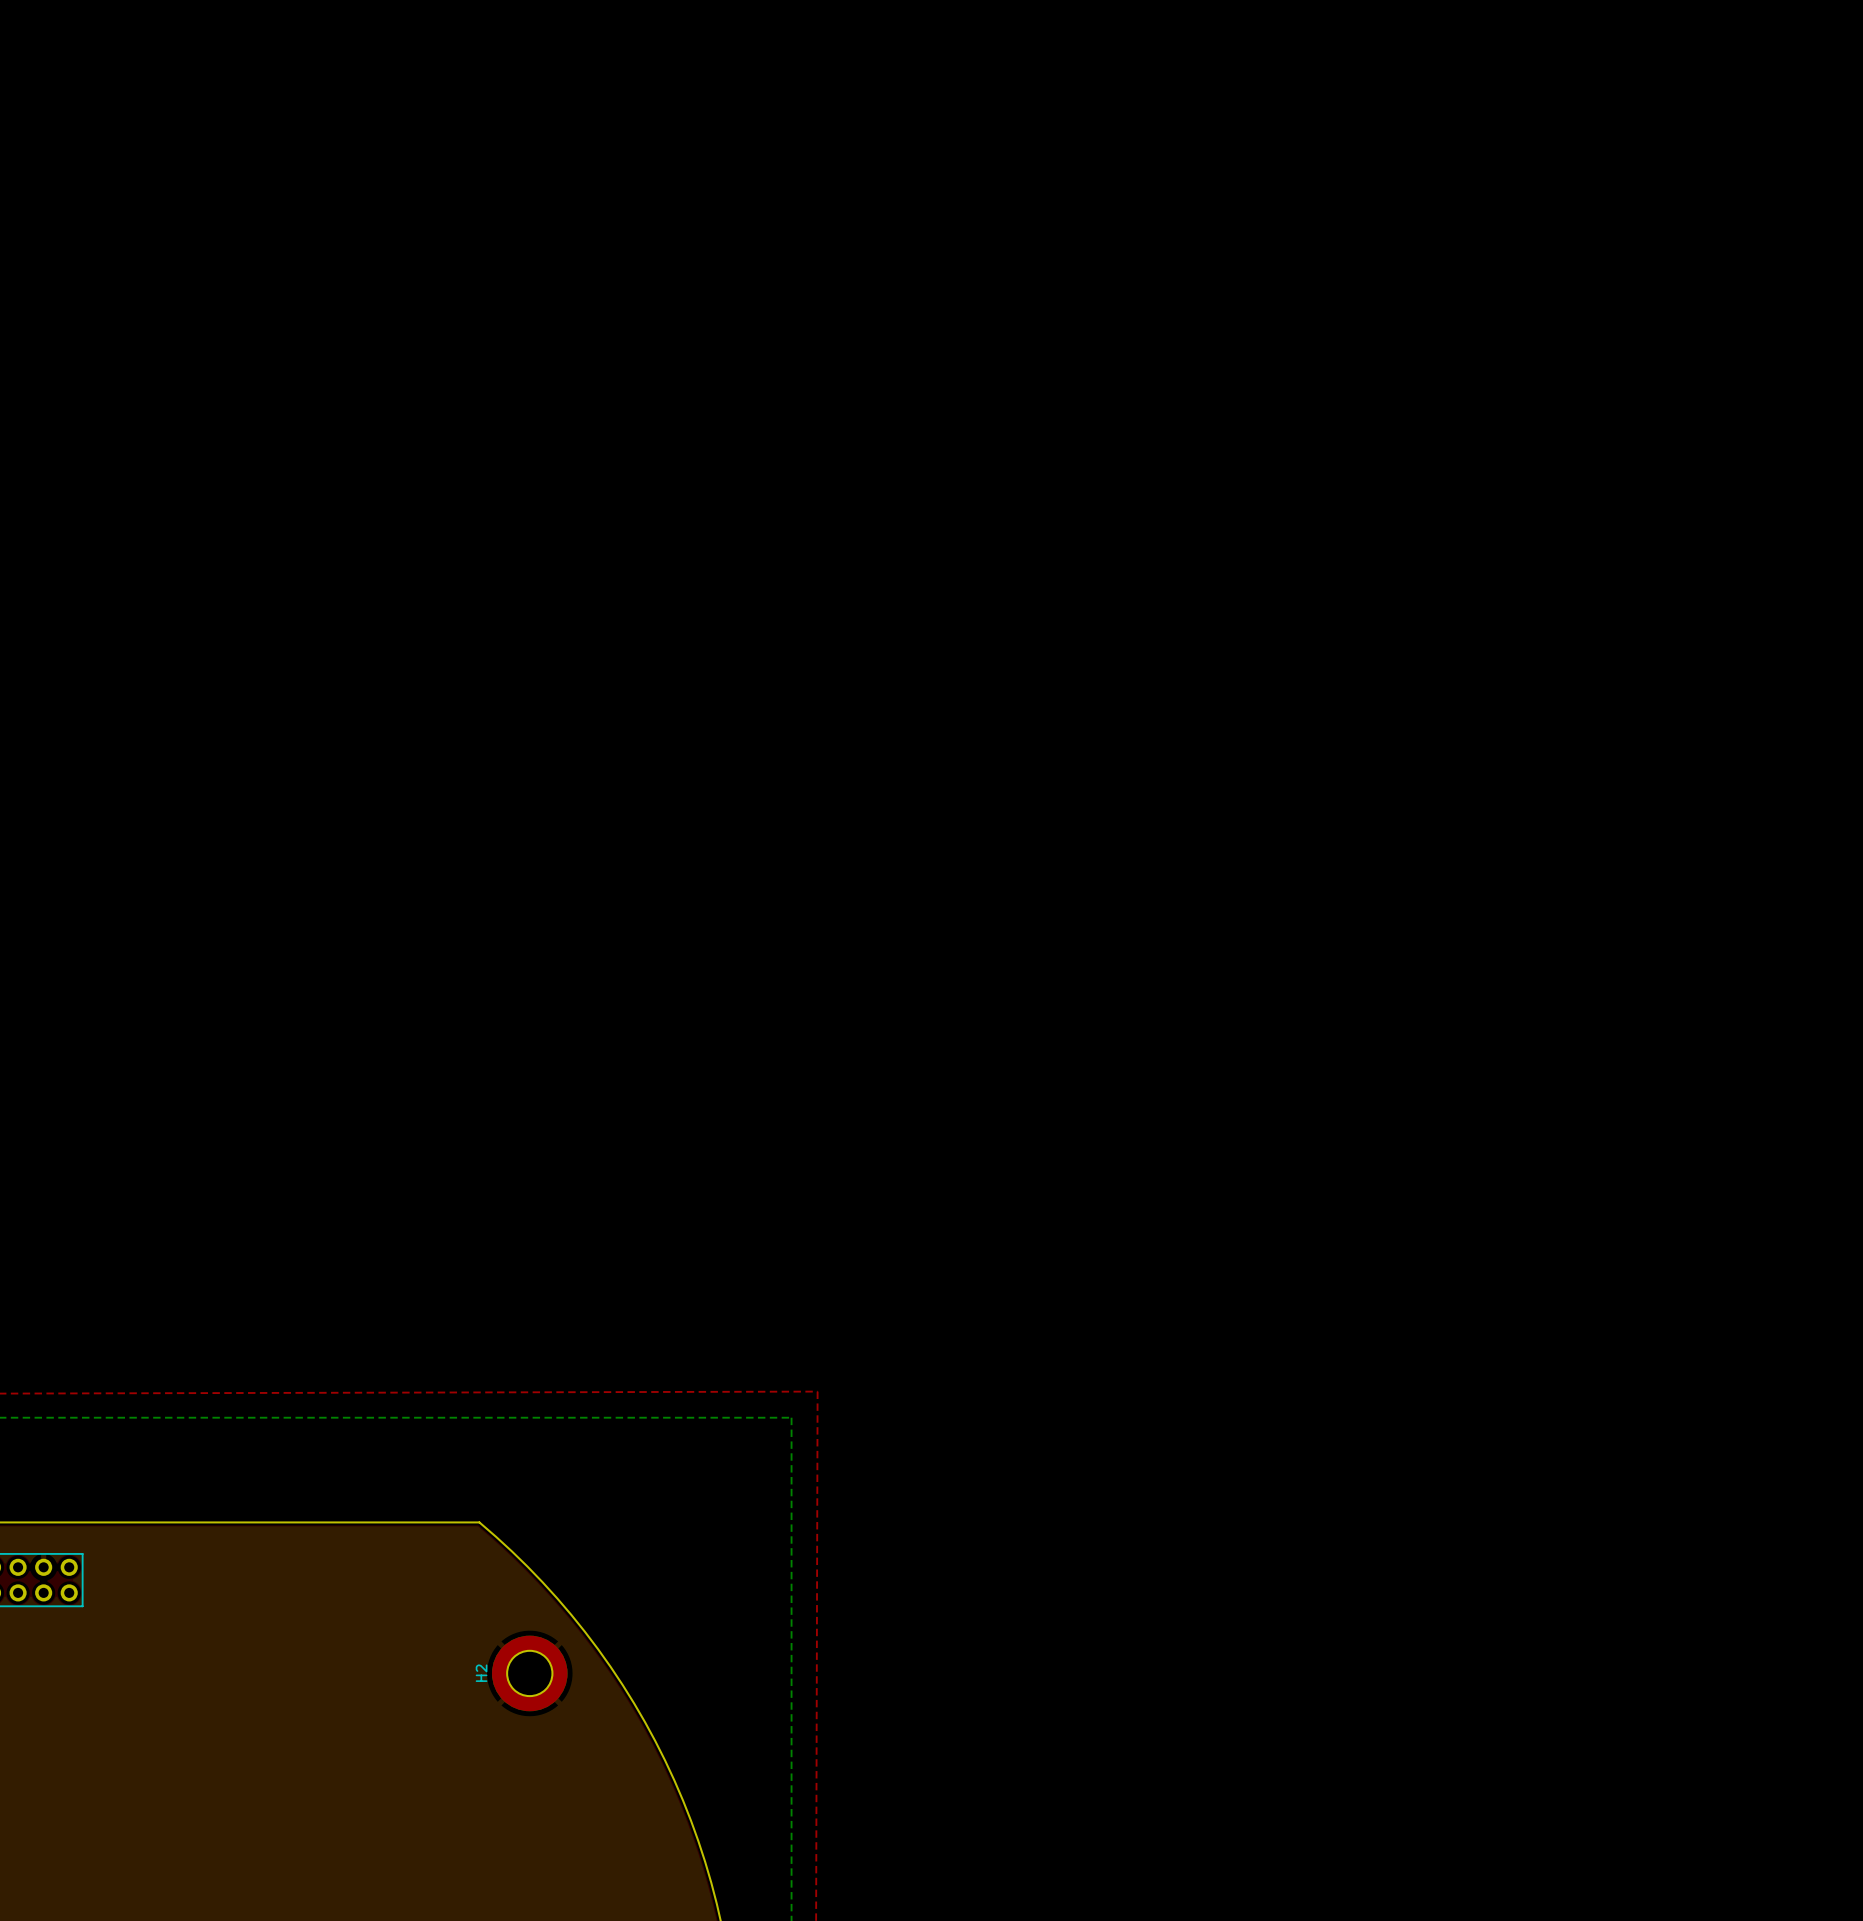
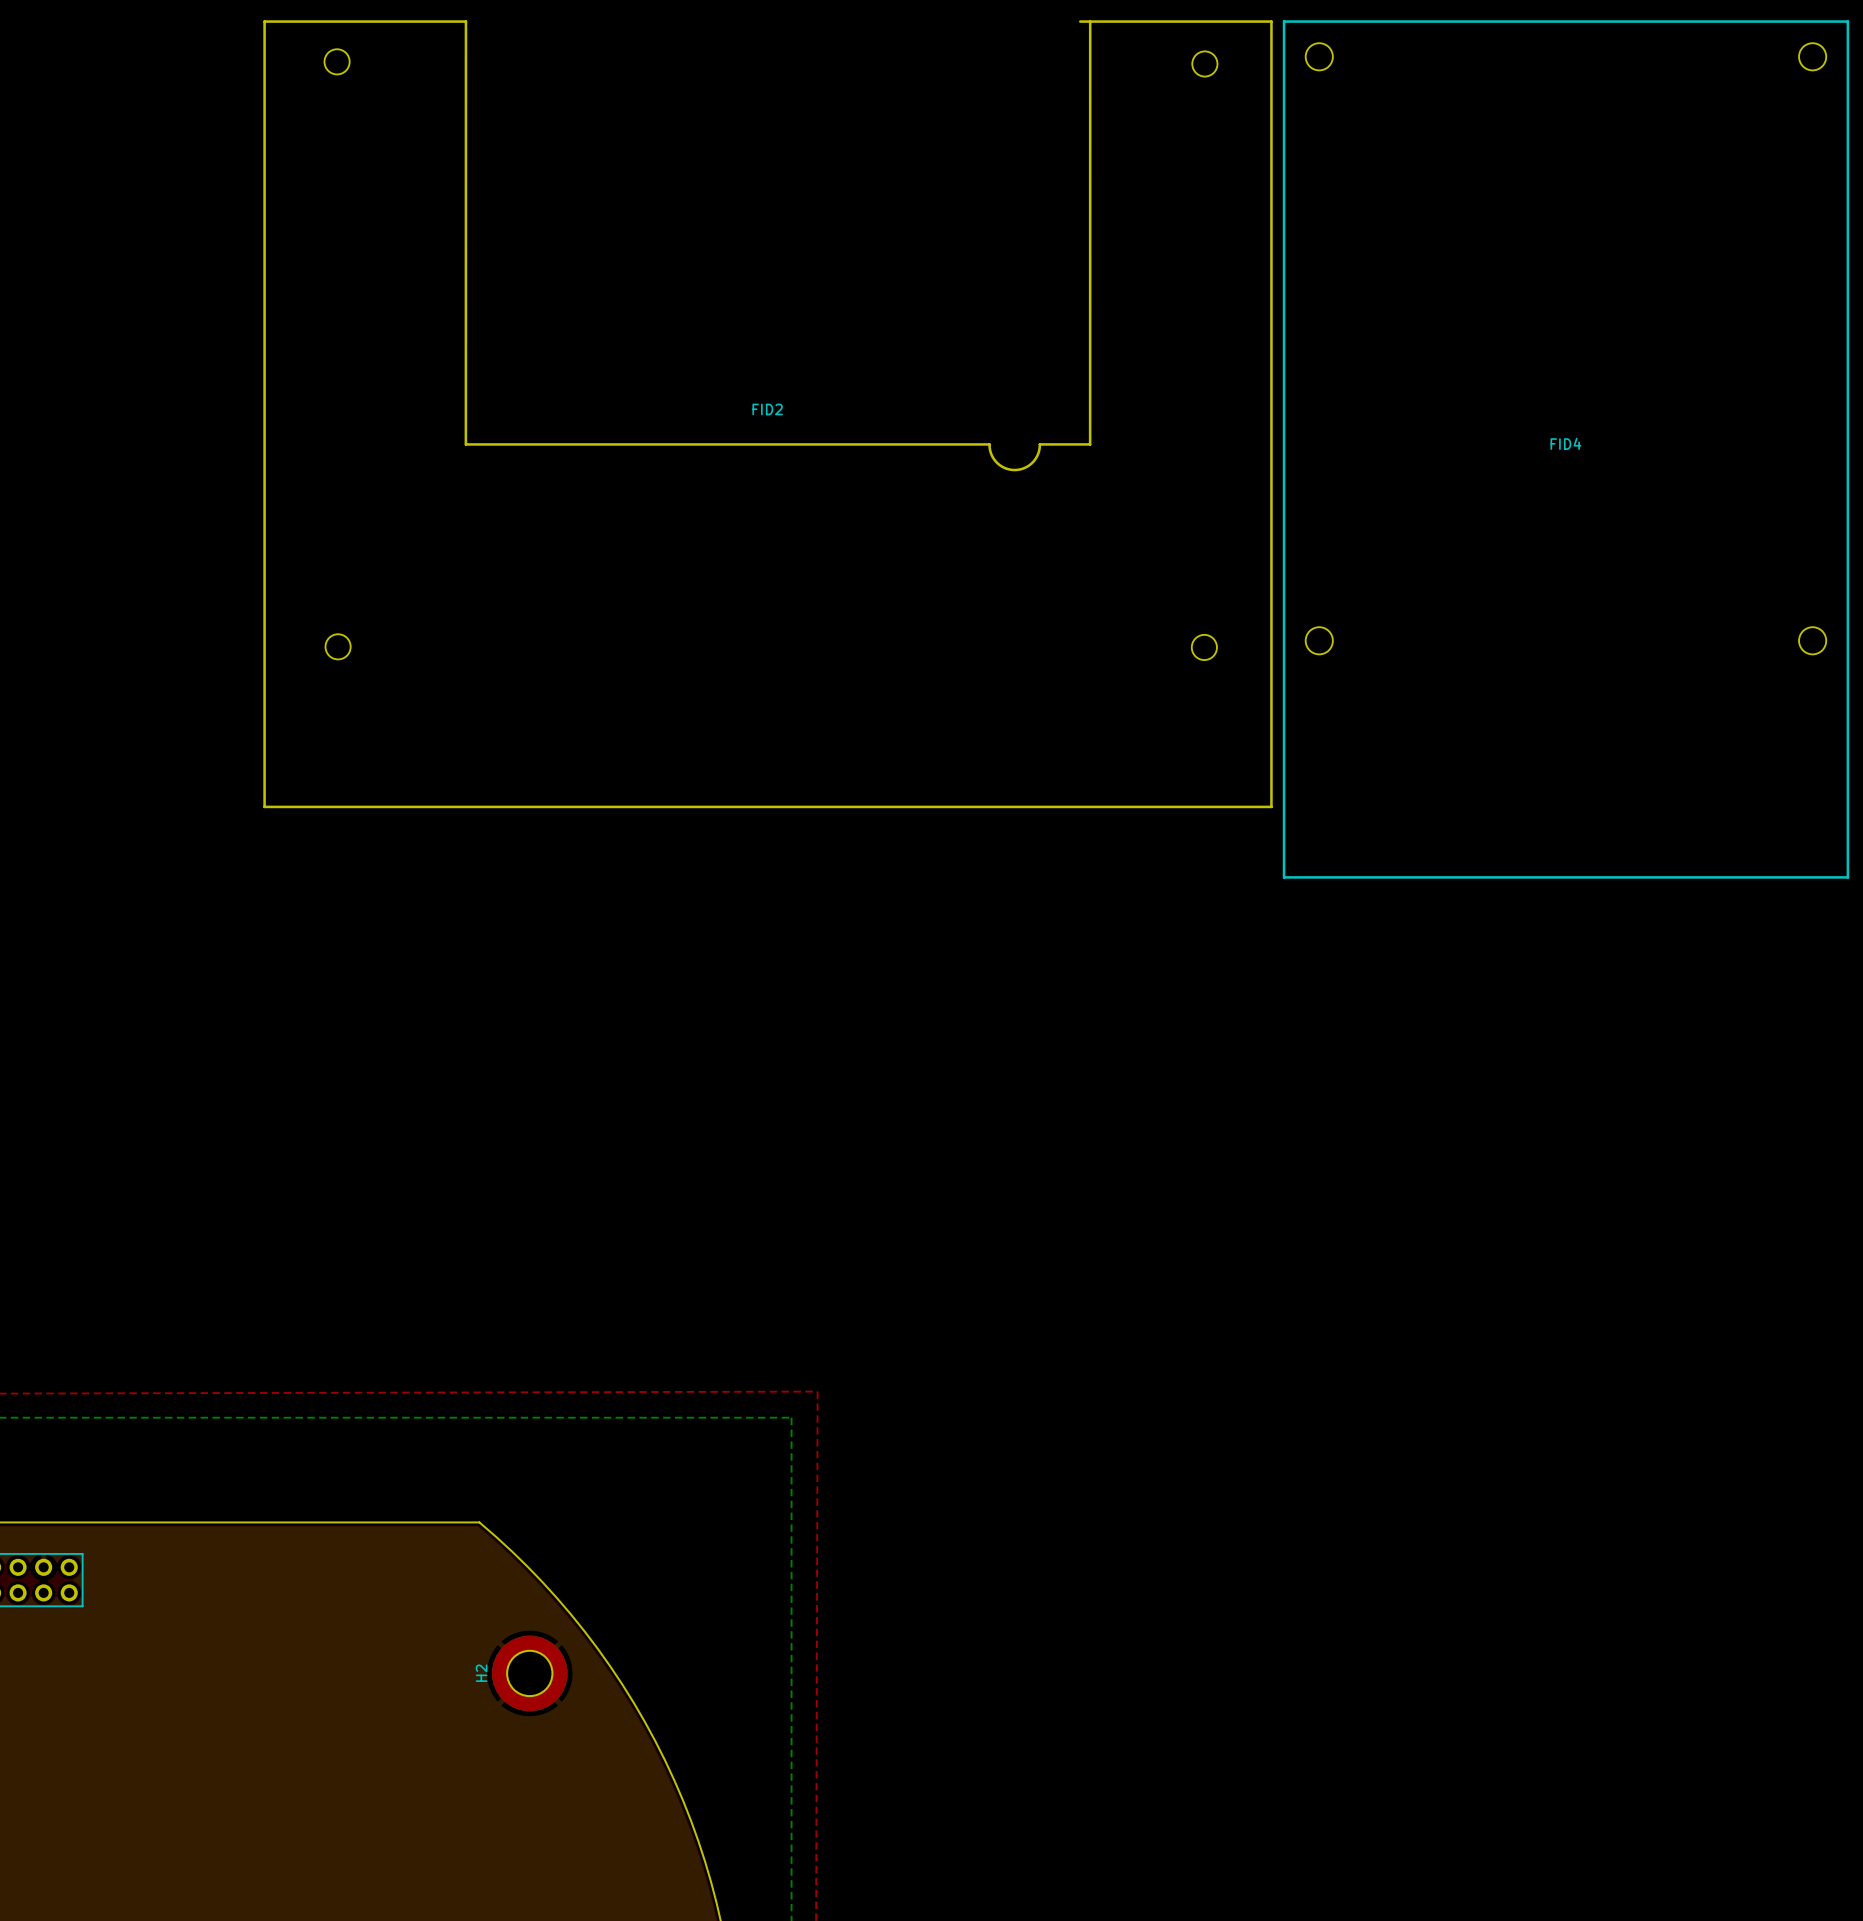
FID2: none -> (768, 414)
FID4: none -> (1565, 449)

